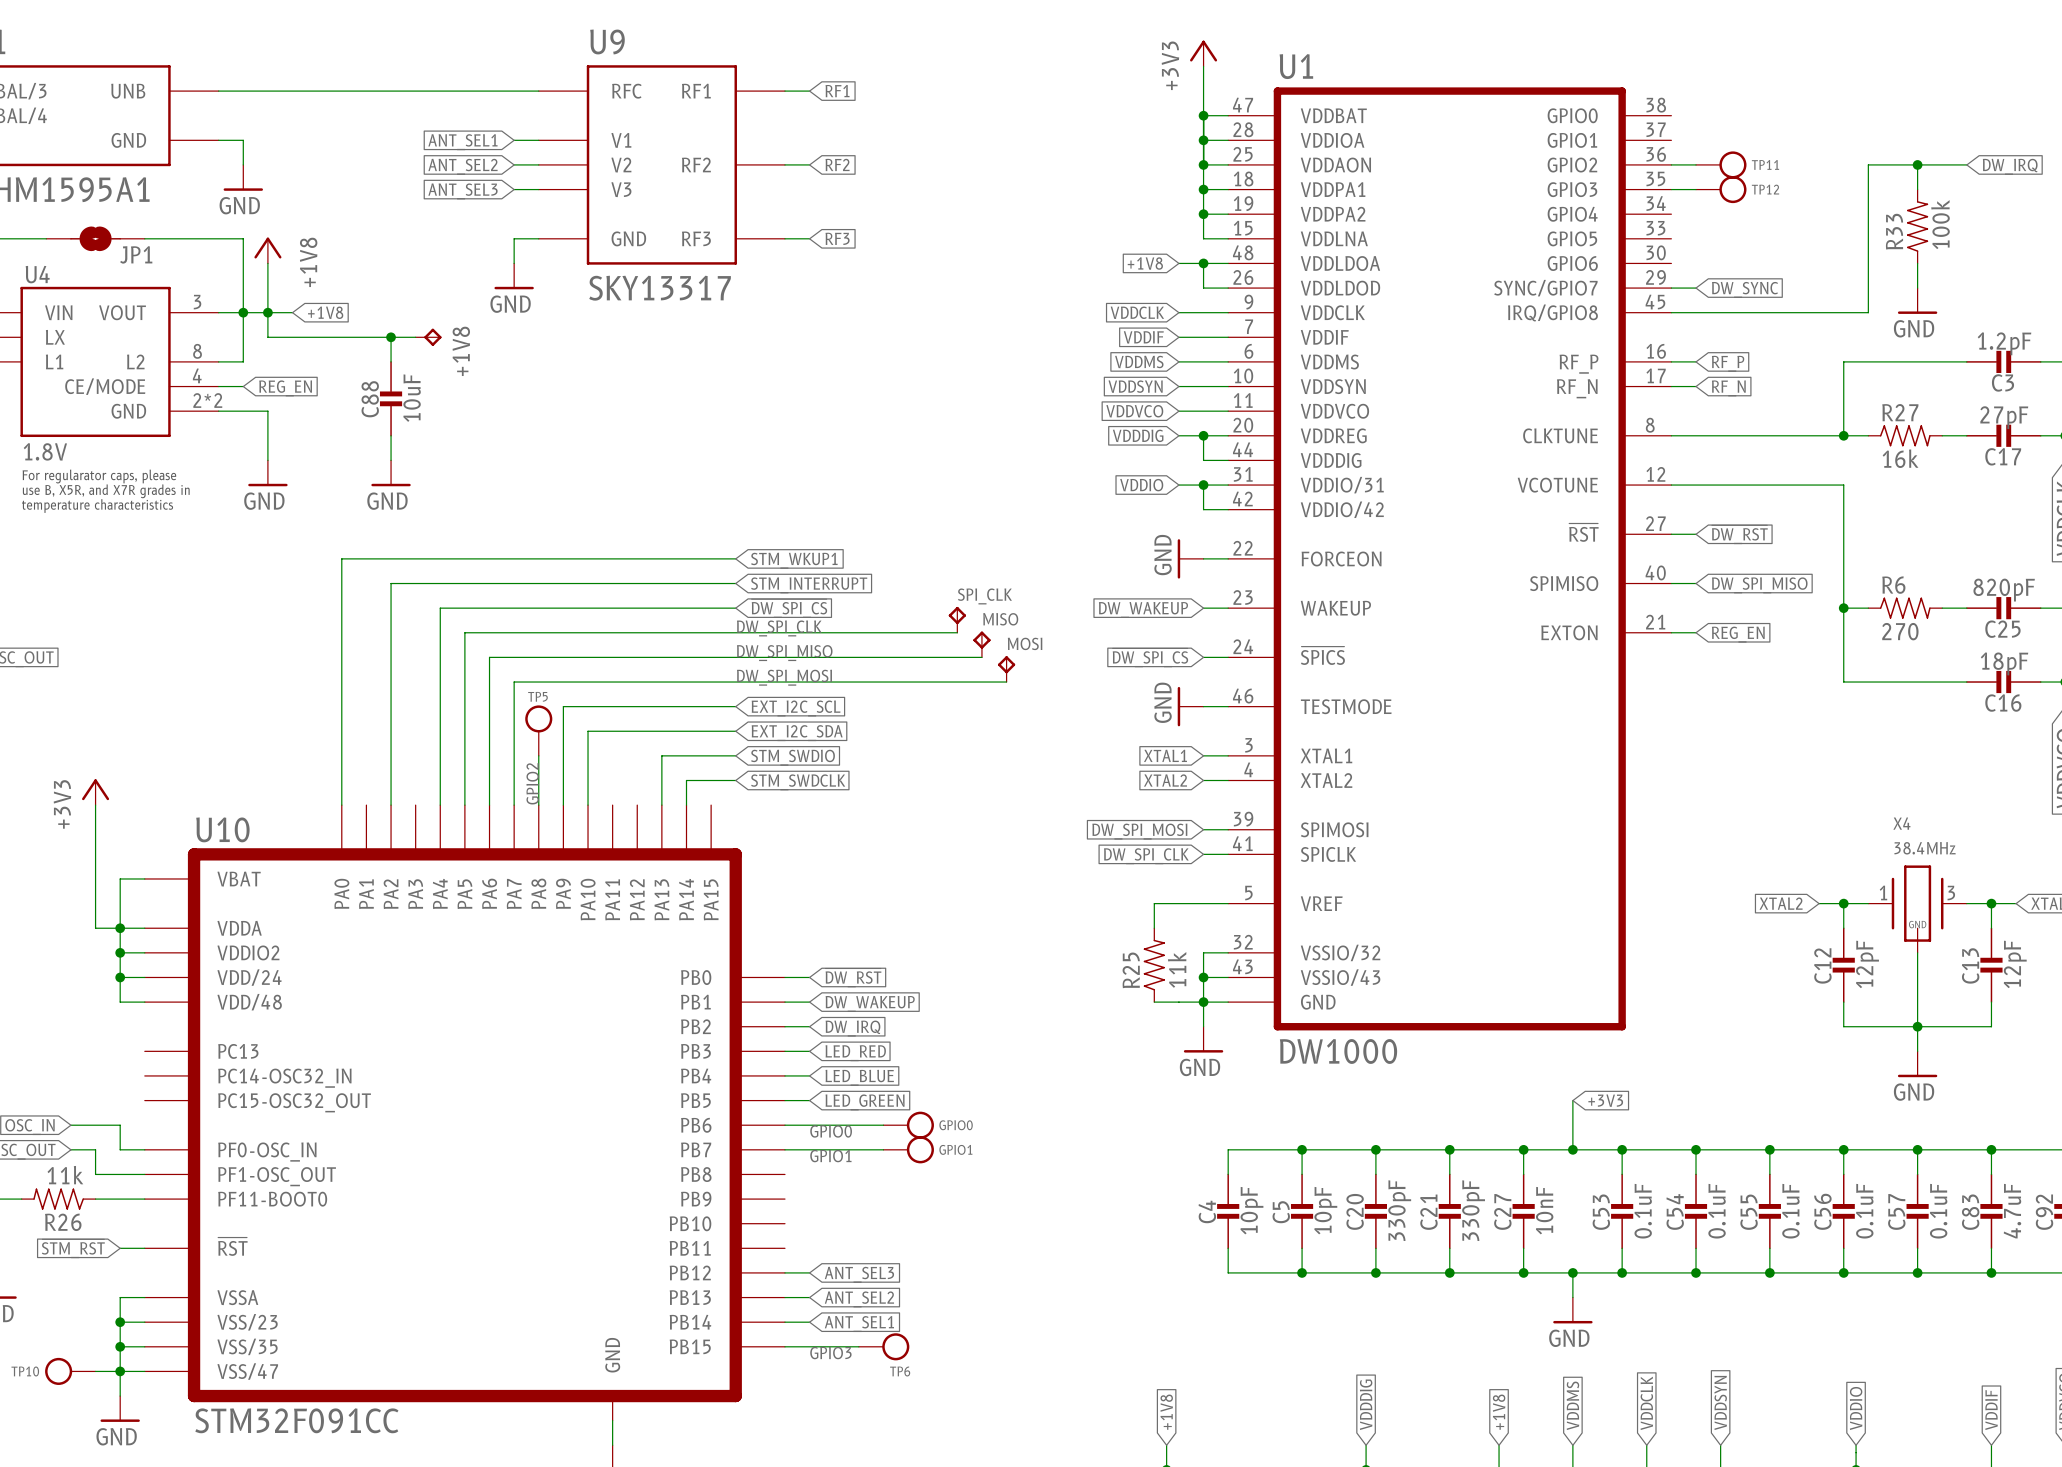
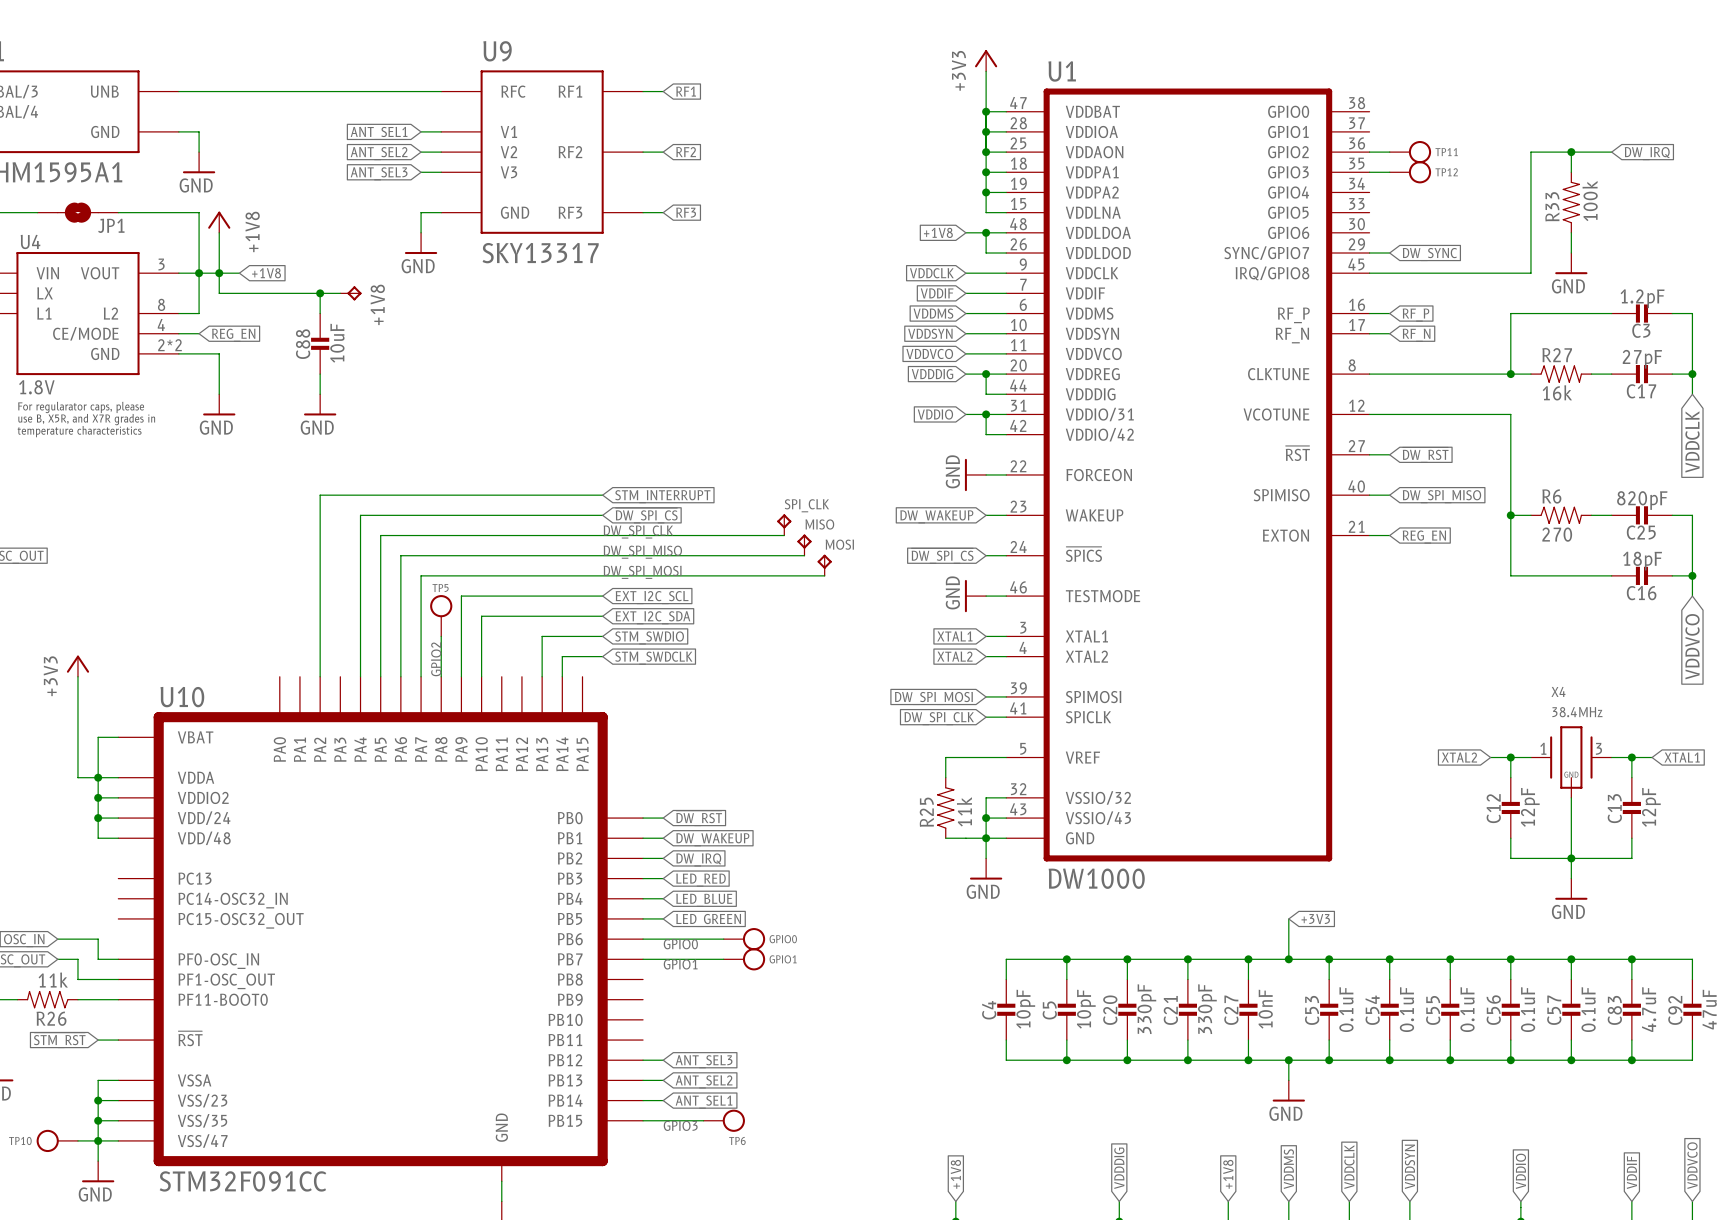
wire: (735, 558) (341, 558) (341, 805) -> none
global label: STM_WKUP1 (794, 560) -> none

